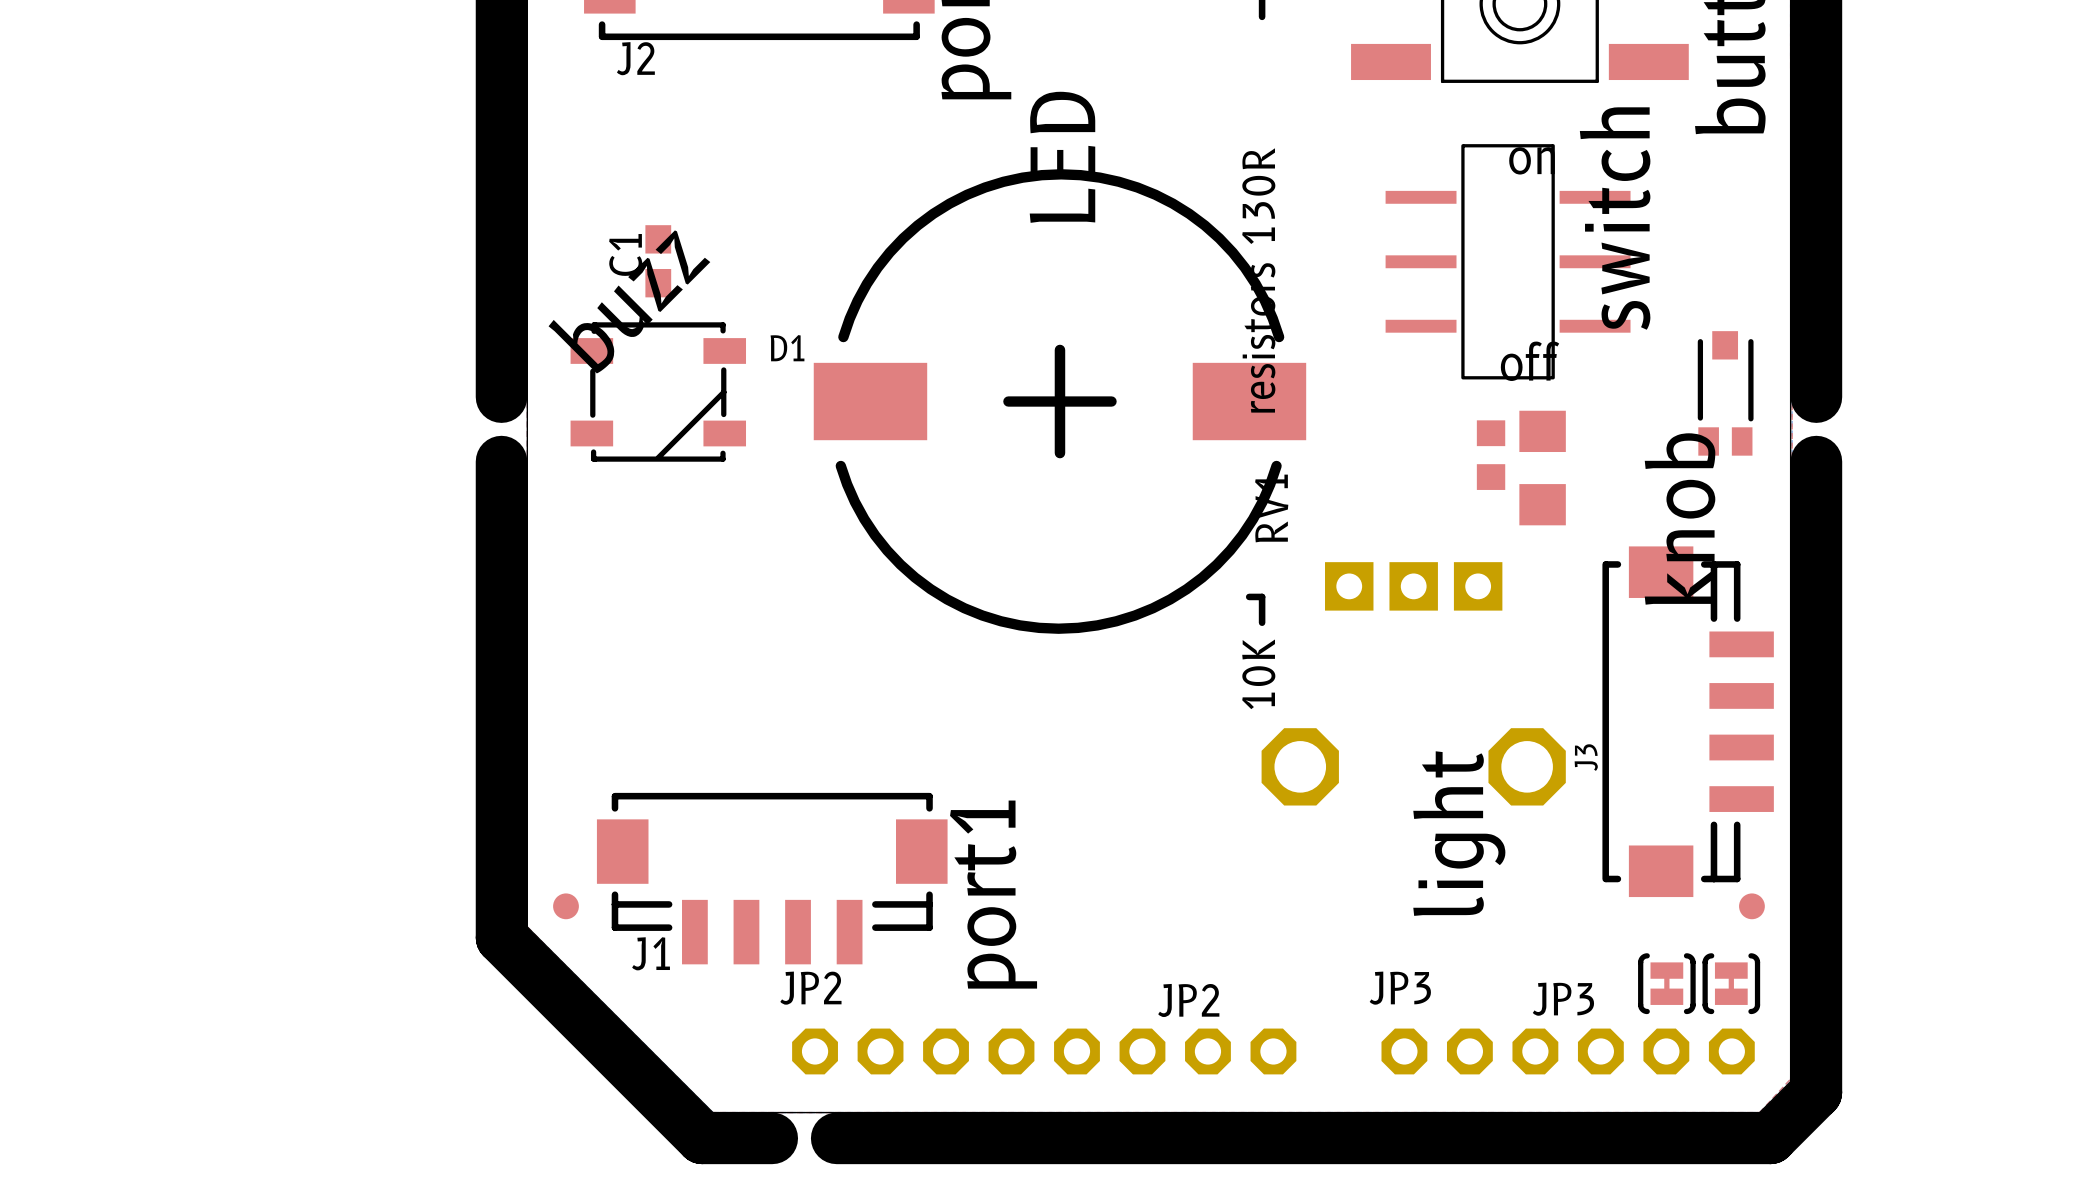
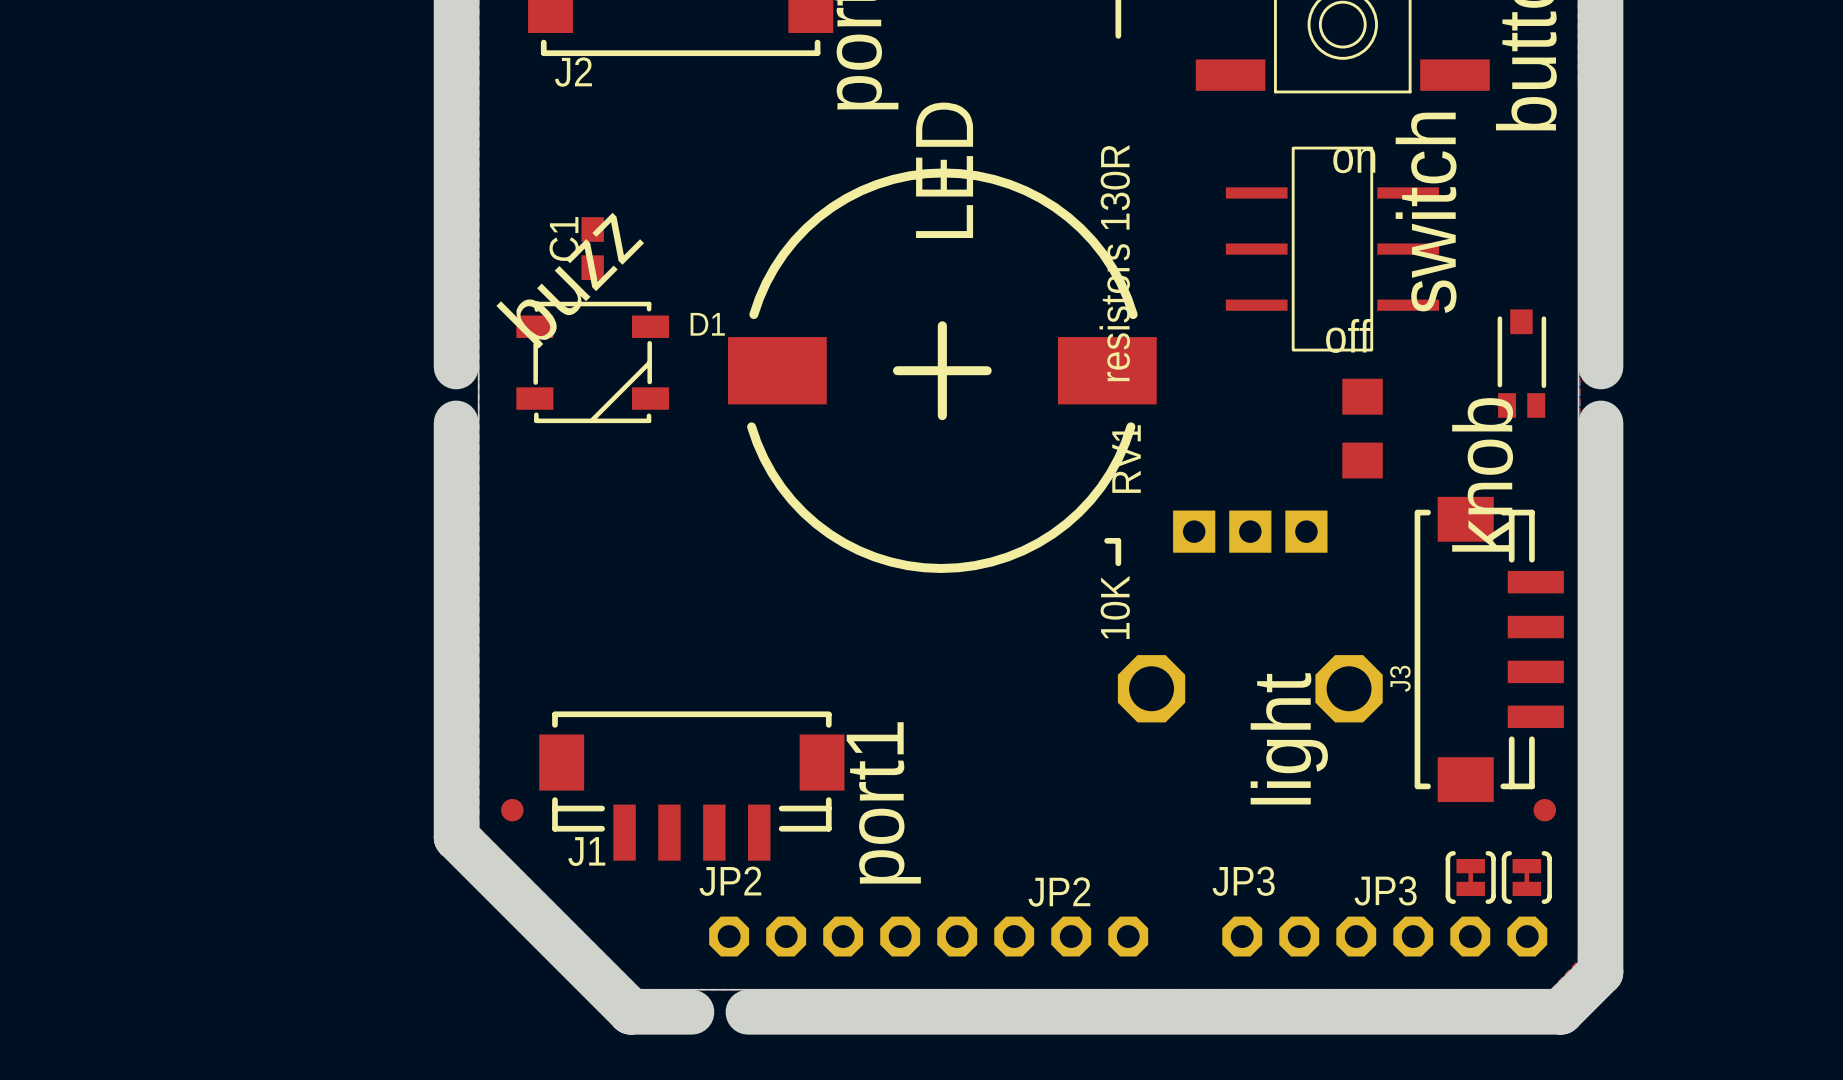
part: (1491, 455) -> none

